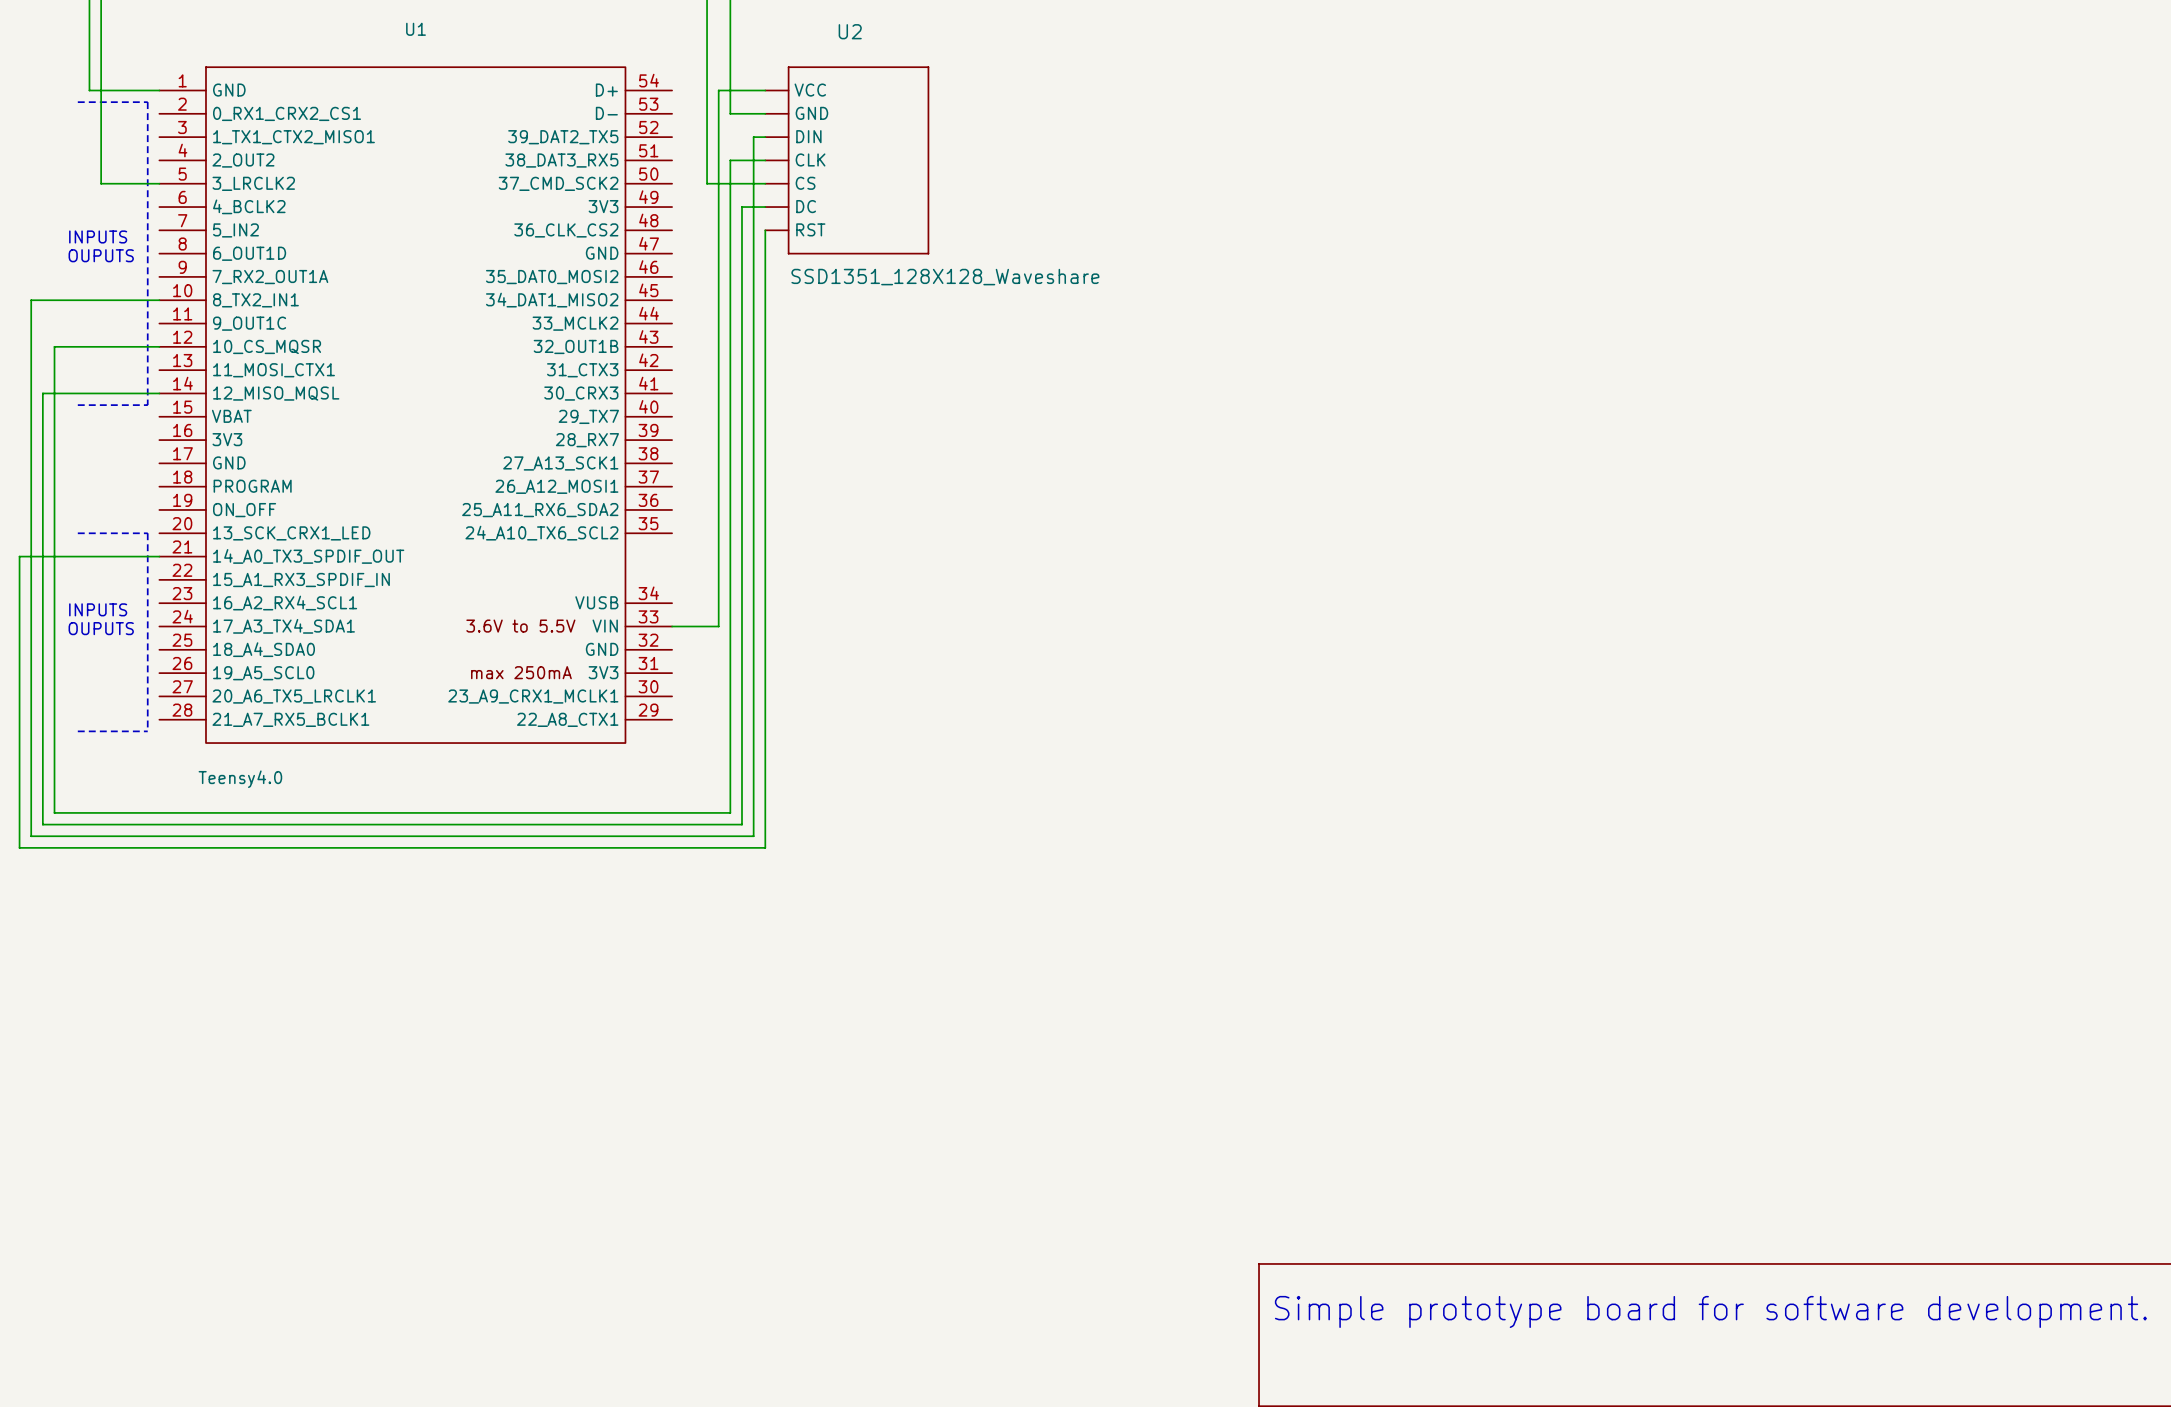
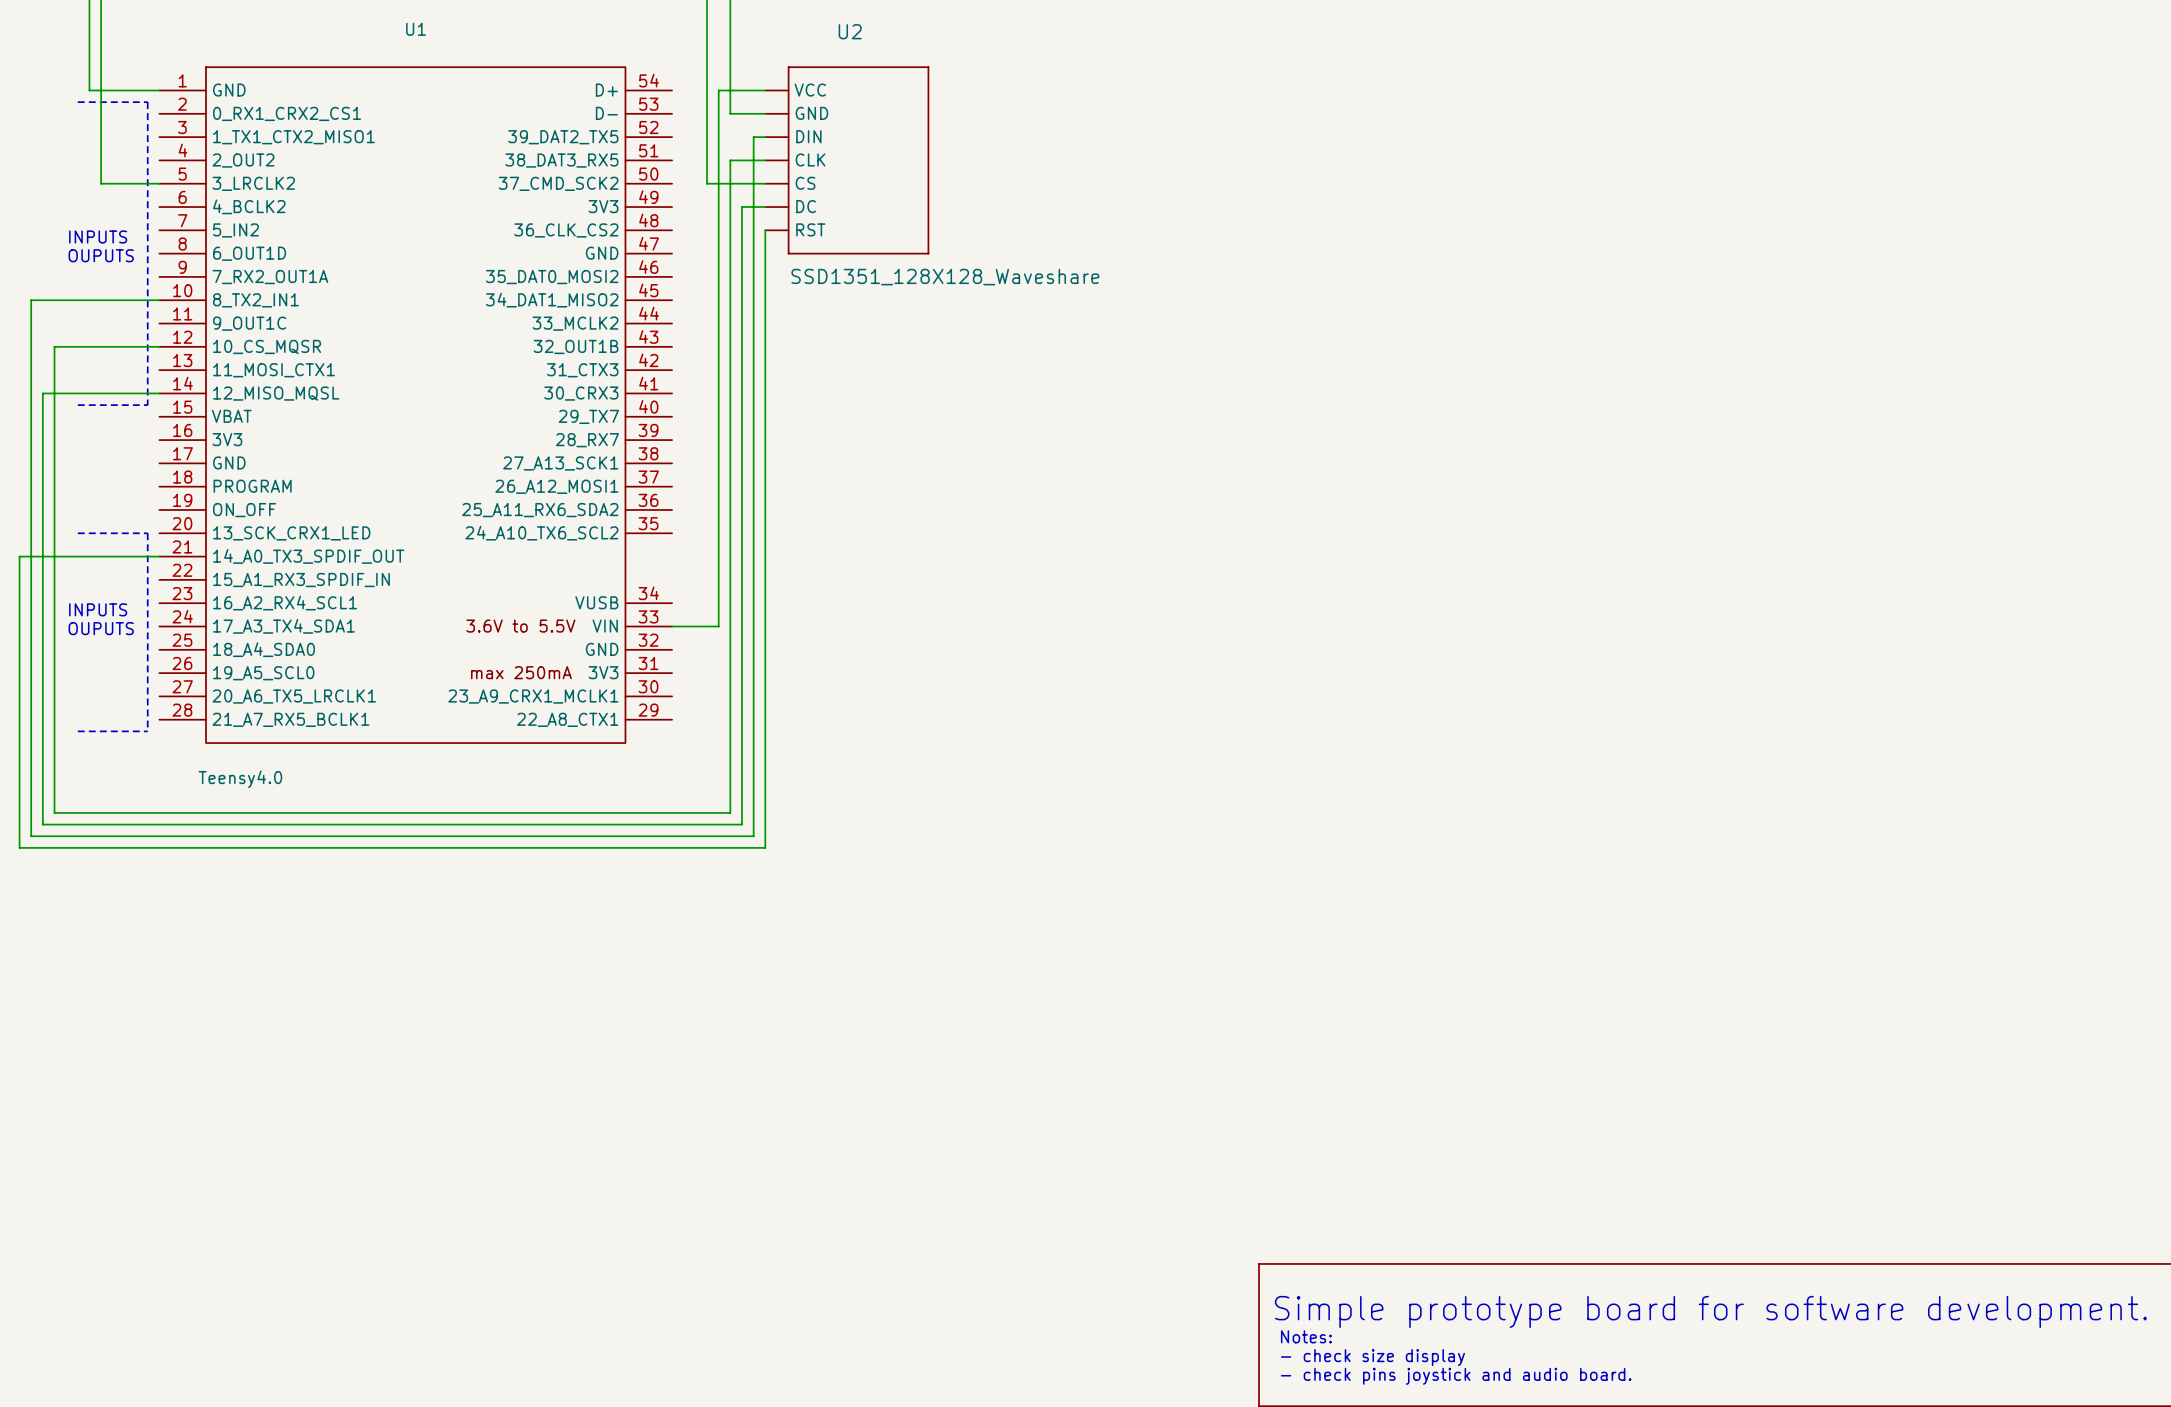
text: none -> Notes: (1306, 1336)
text: none -> - check size display (1372, 1357)
text: none -> - check pins joystick and audio board. (1456, 1376)

